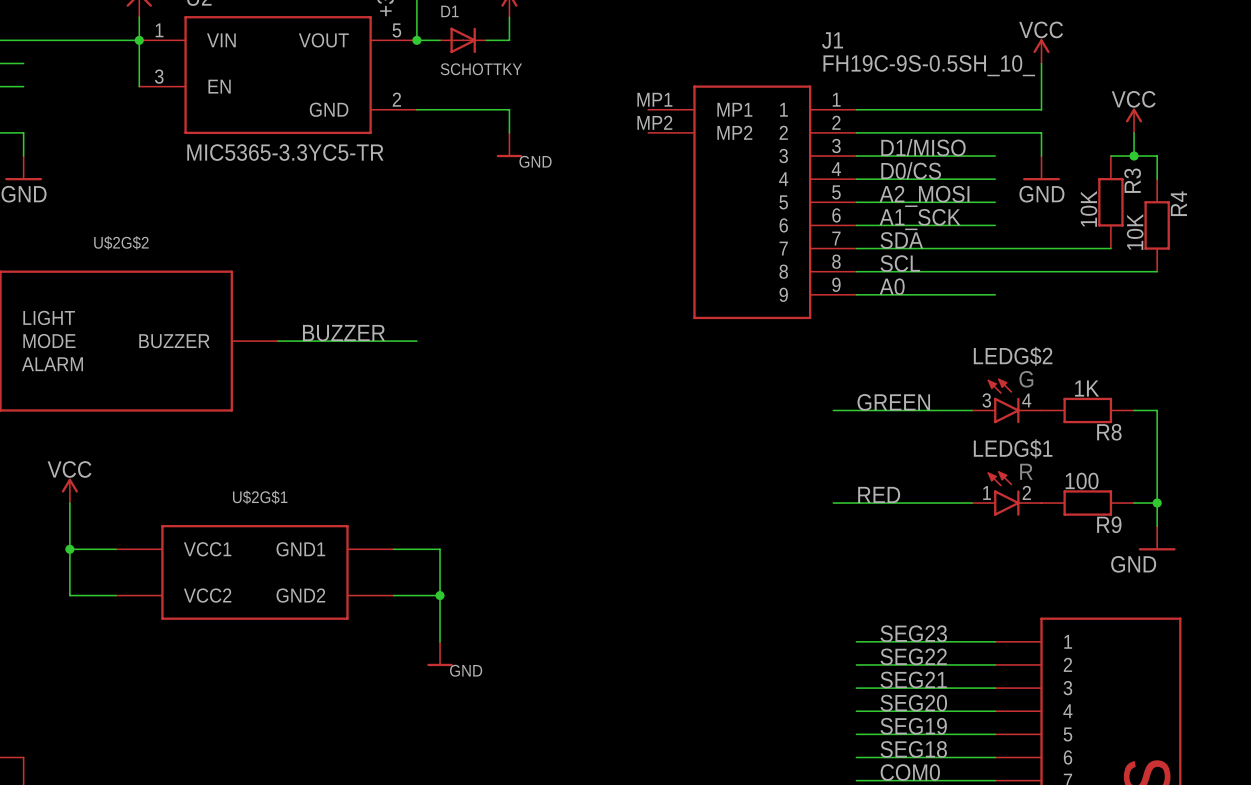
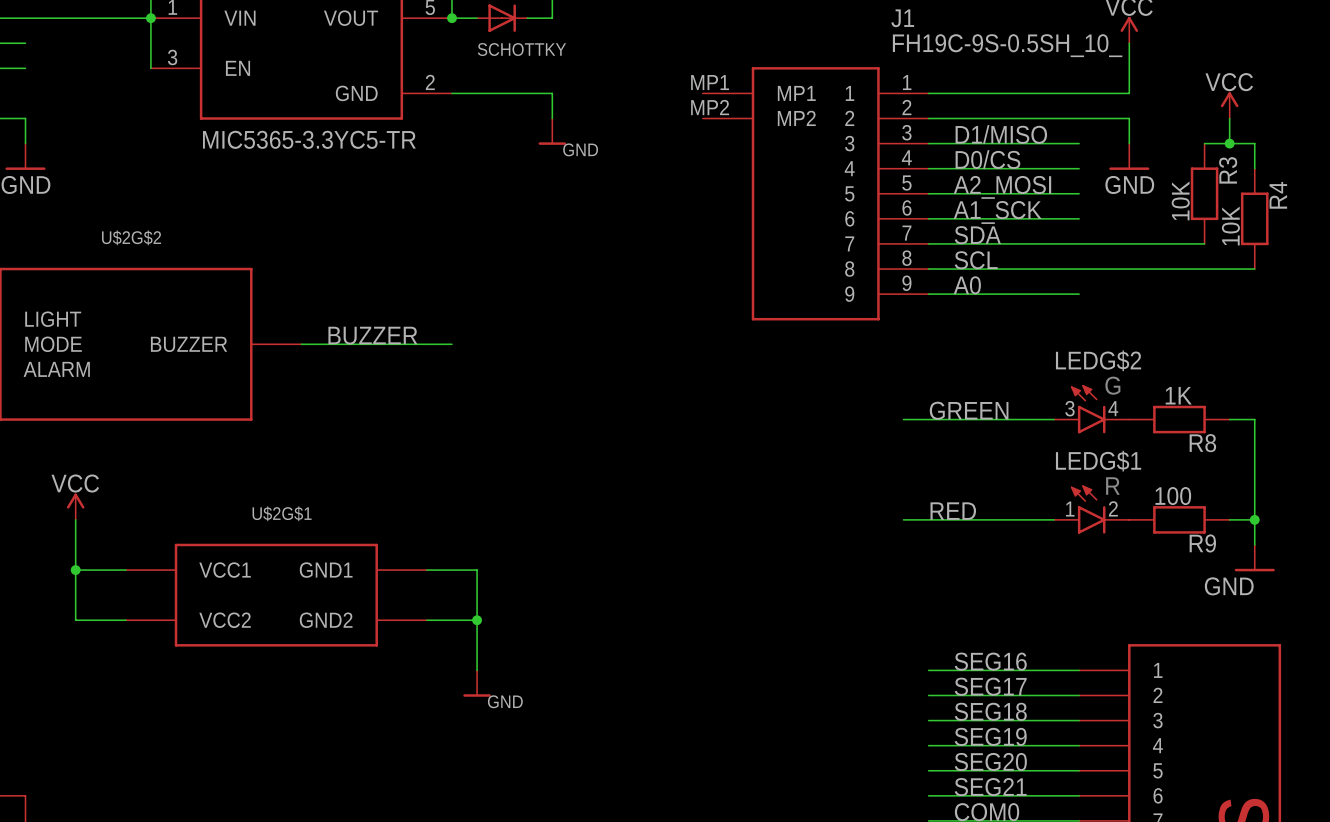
label: SEG23 (913, 633) -> SEG16 (990, 661)
label: SEG22 (913, 656) -> SEG17 (990, 686)
label: SEG21 (913, 679) -> SEG18 (990, 711)
label: SEG20 (913, 703) -> SEG19 (990, 736)
label: SEG19 (913, 726) -> SEG20 (990, 761)
label: SEG18 (913, 749) -> SEG21 (990, 787)

